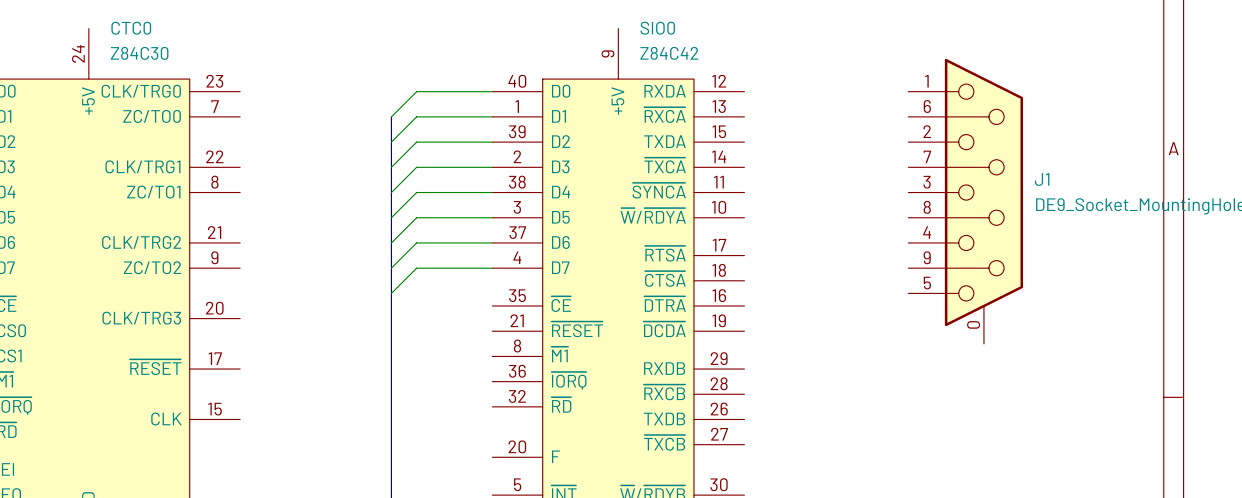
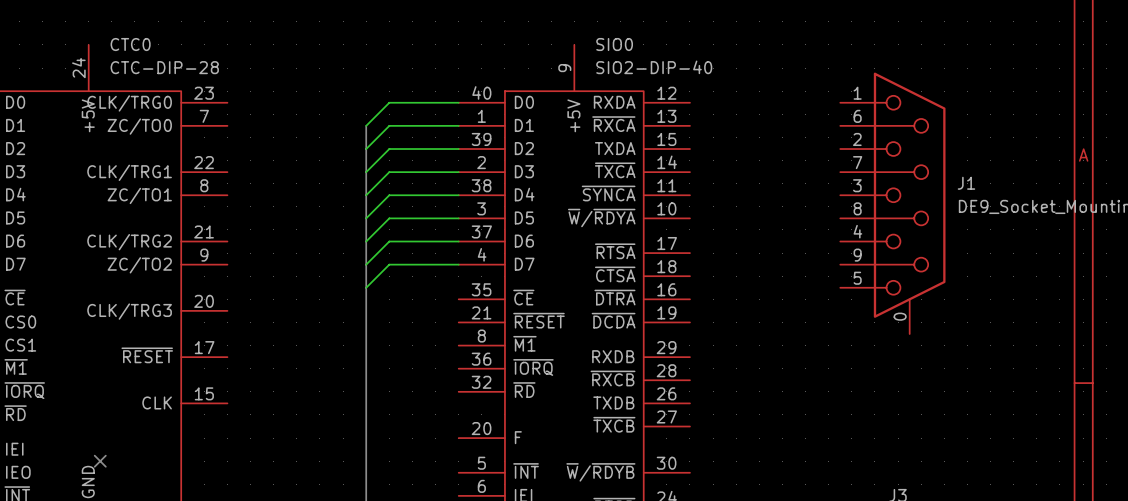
CTC0 value: Z84C30 (139, 53) -> CTC-DIP-28 (164, 67)
SIO0 value: Z84C42 (669, 53) -> SIO2-DIP-40 (654, 67)
no-connect mark: none -> (100, 461)

